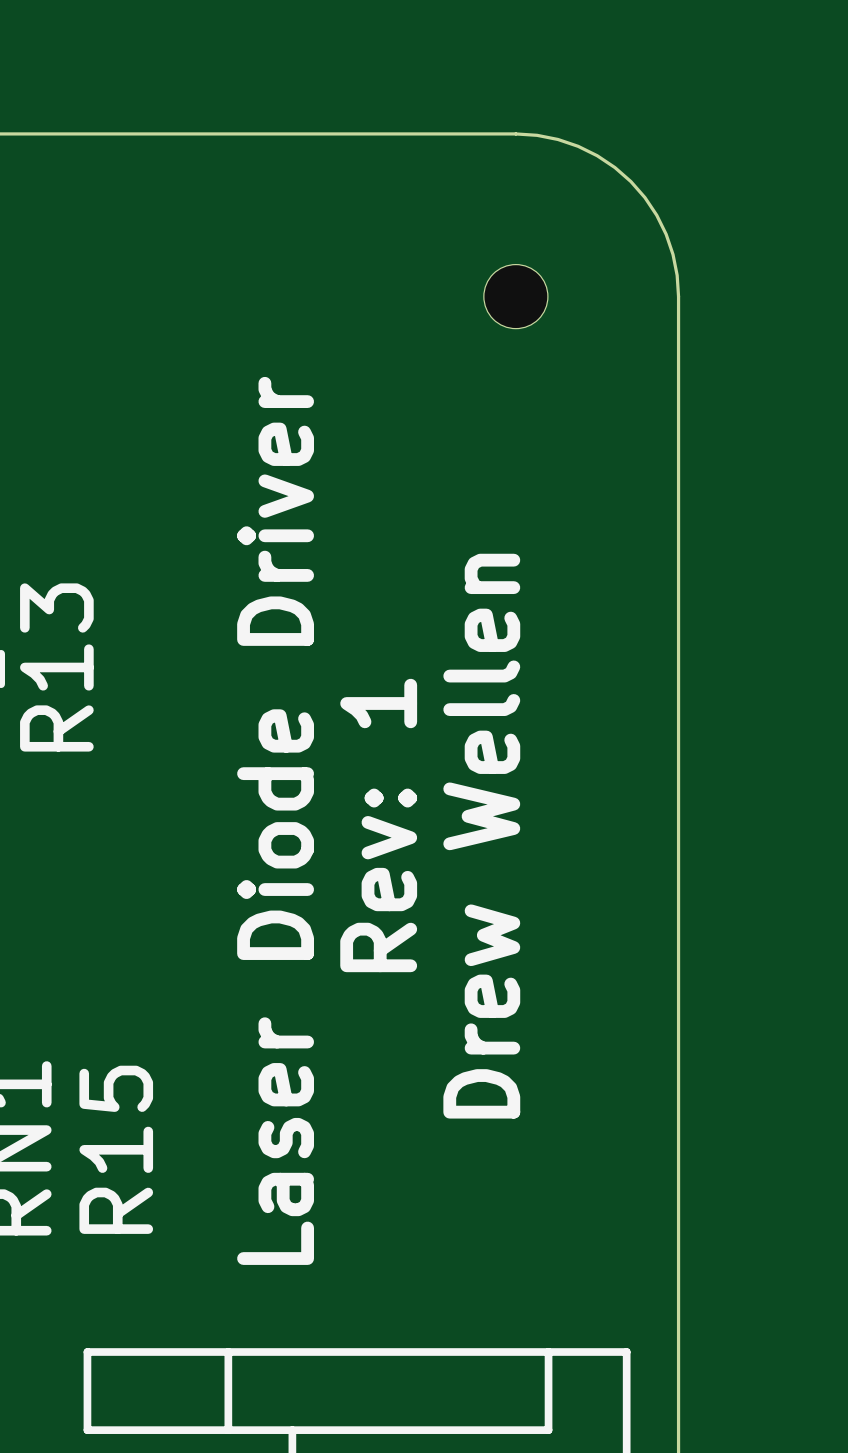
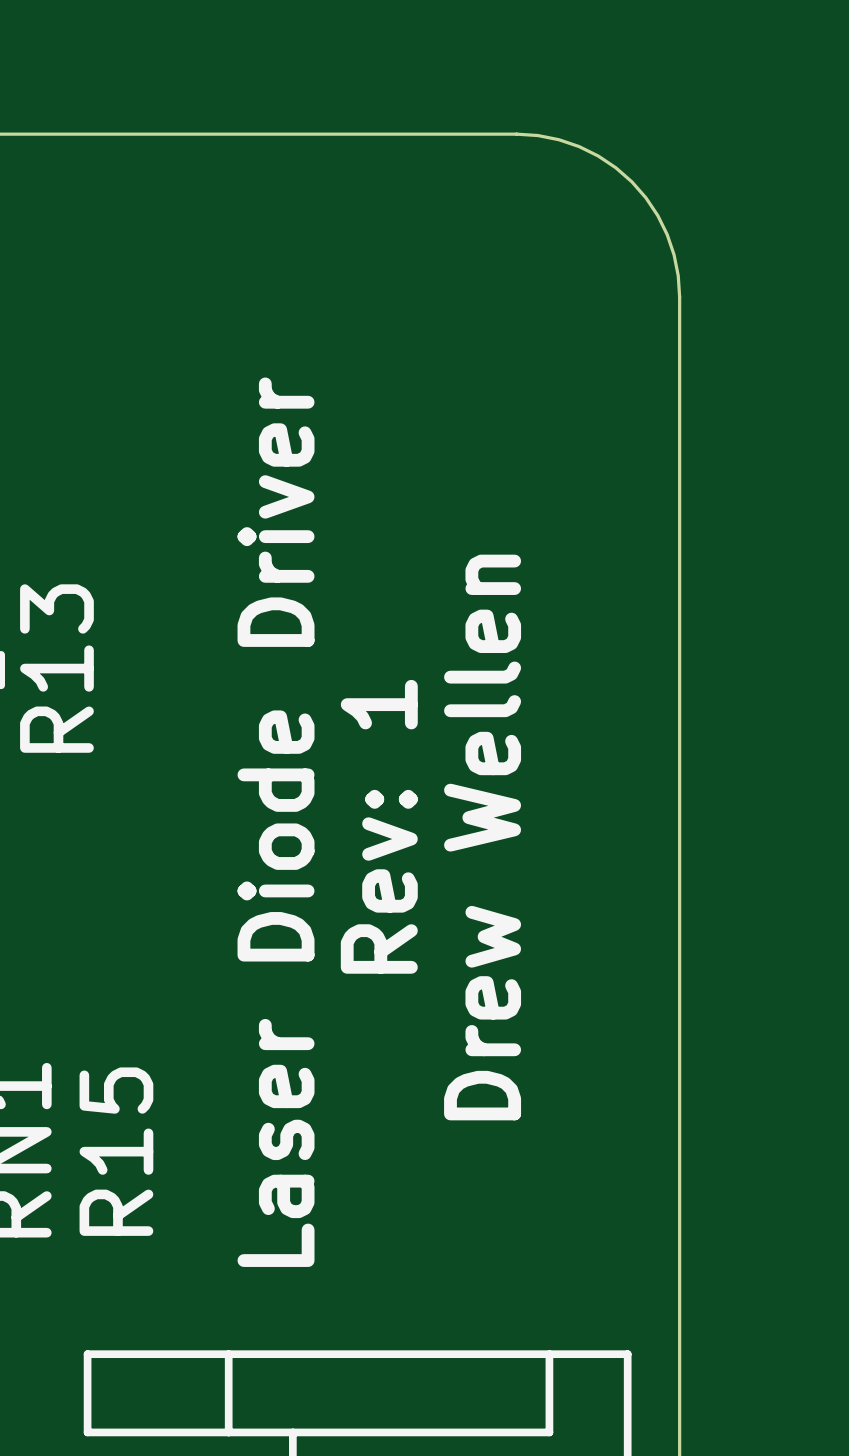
part: (515, 296) -> none

